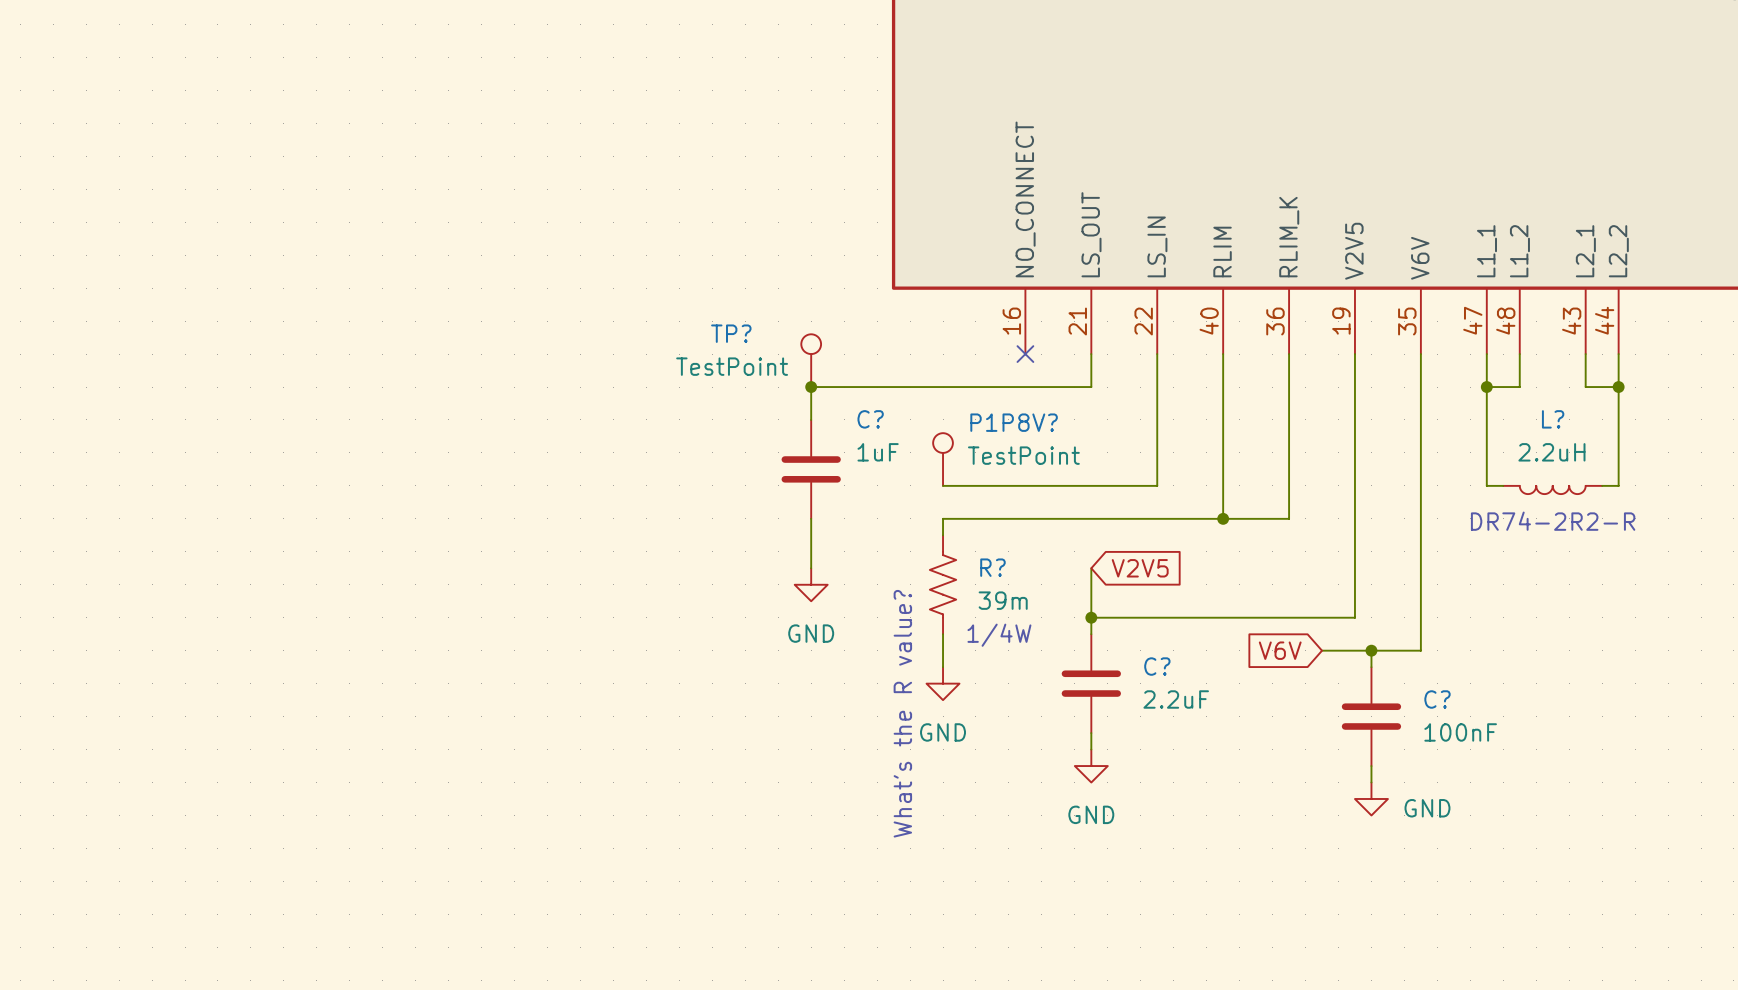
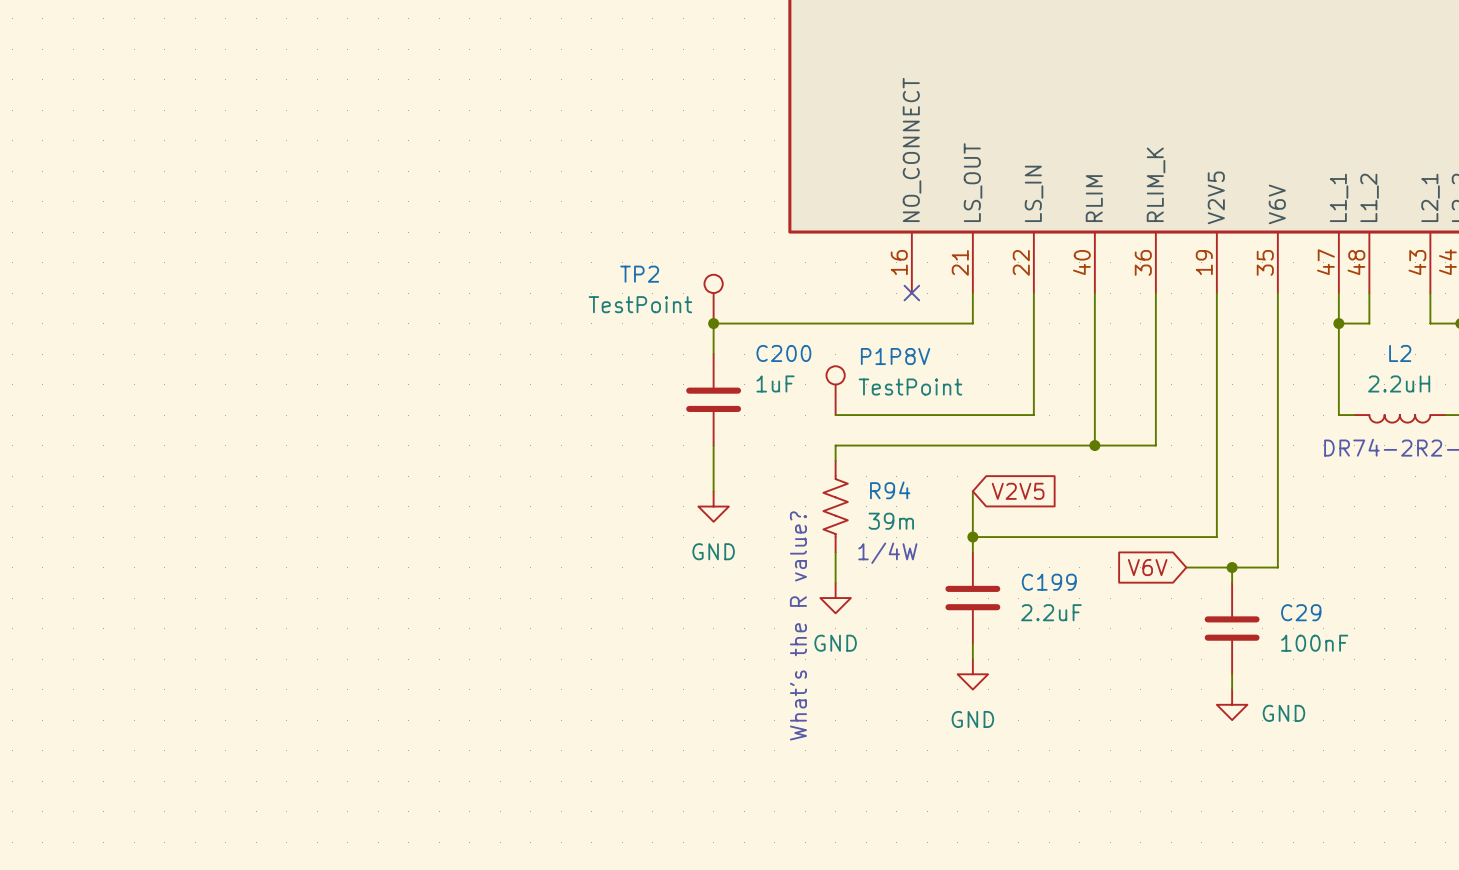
TP? name: TP? (731, 333) -> TP2 (639, 274)
C? name: C? (870, 419) -> C200 (783, 353)
L? name: L? (1553, 419) -> L2 (1400, 353)
P1P8V? name: P1P8V? (1014, 422) -> P1P8V (895, 356)
R? name: R? (992, 567) -> R94 (890, 490)
C? name: C? (1157, 666) -> C199 (1049, 582)
C? name: C? (1437, 699) -> C29 (1301, 612)

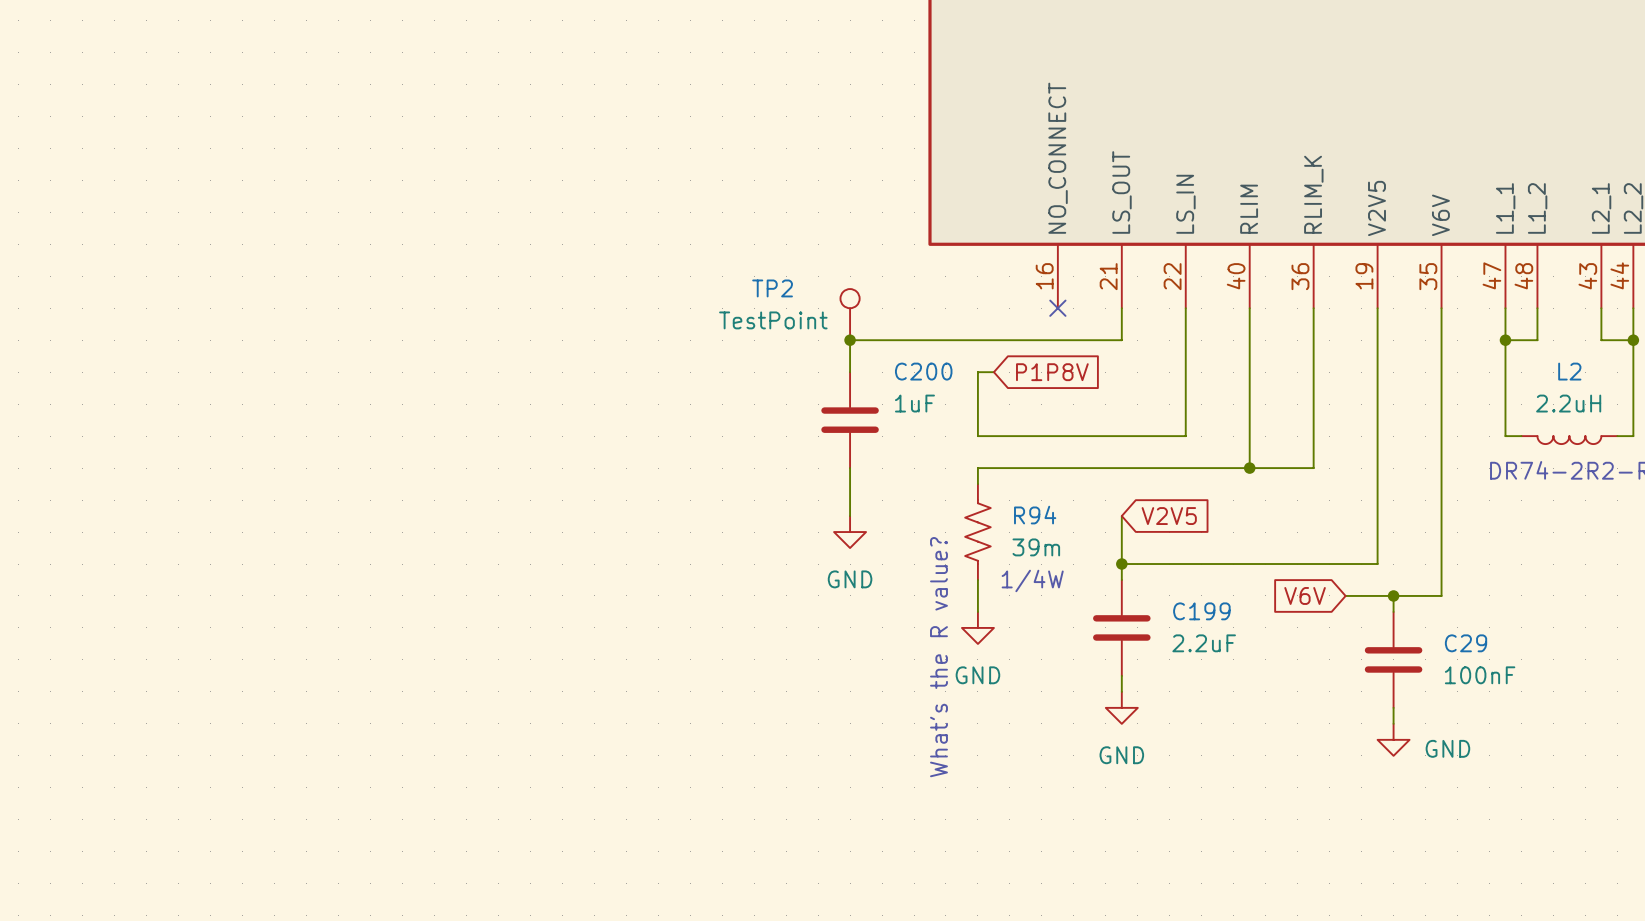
wire: none -> (993, 372) (977, 372) (977, 436)
global label: none -> P1P8V (1052, 372)
P1P8V: TestPoint (835, 390) -> none

